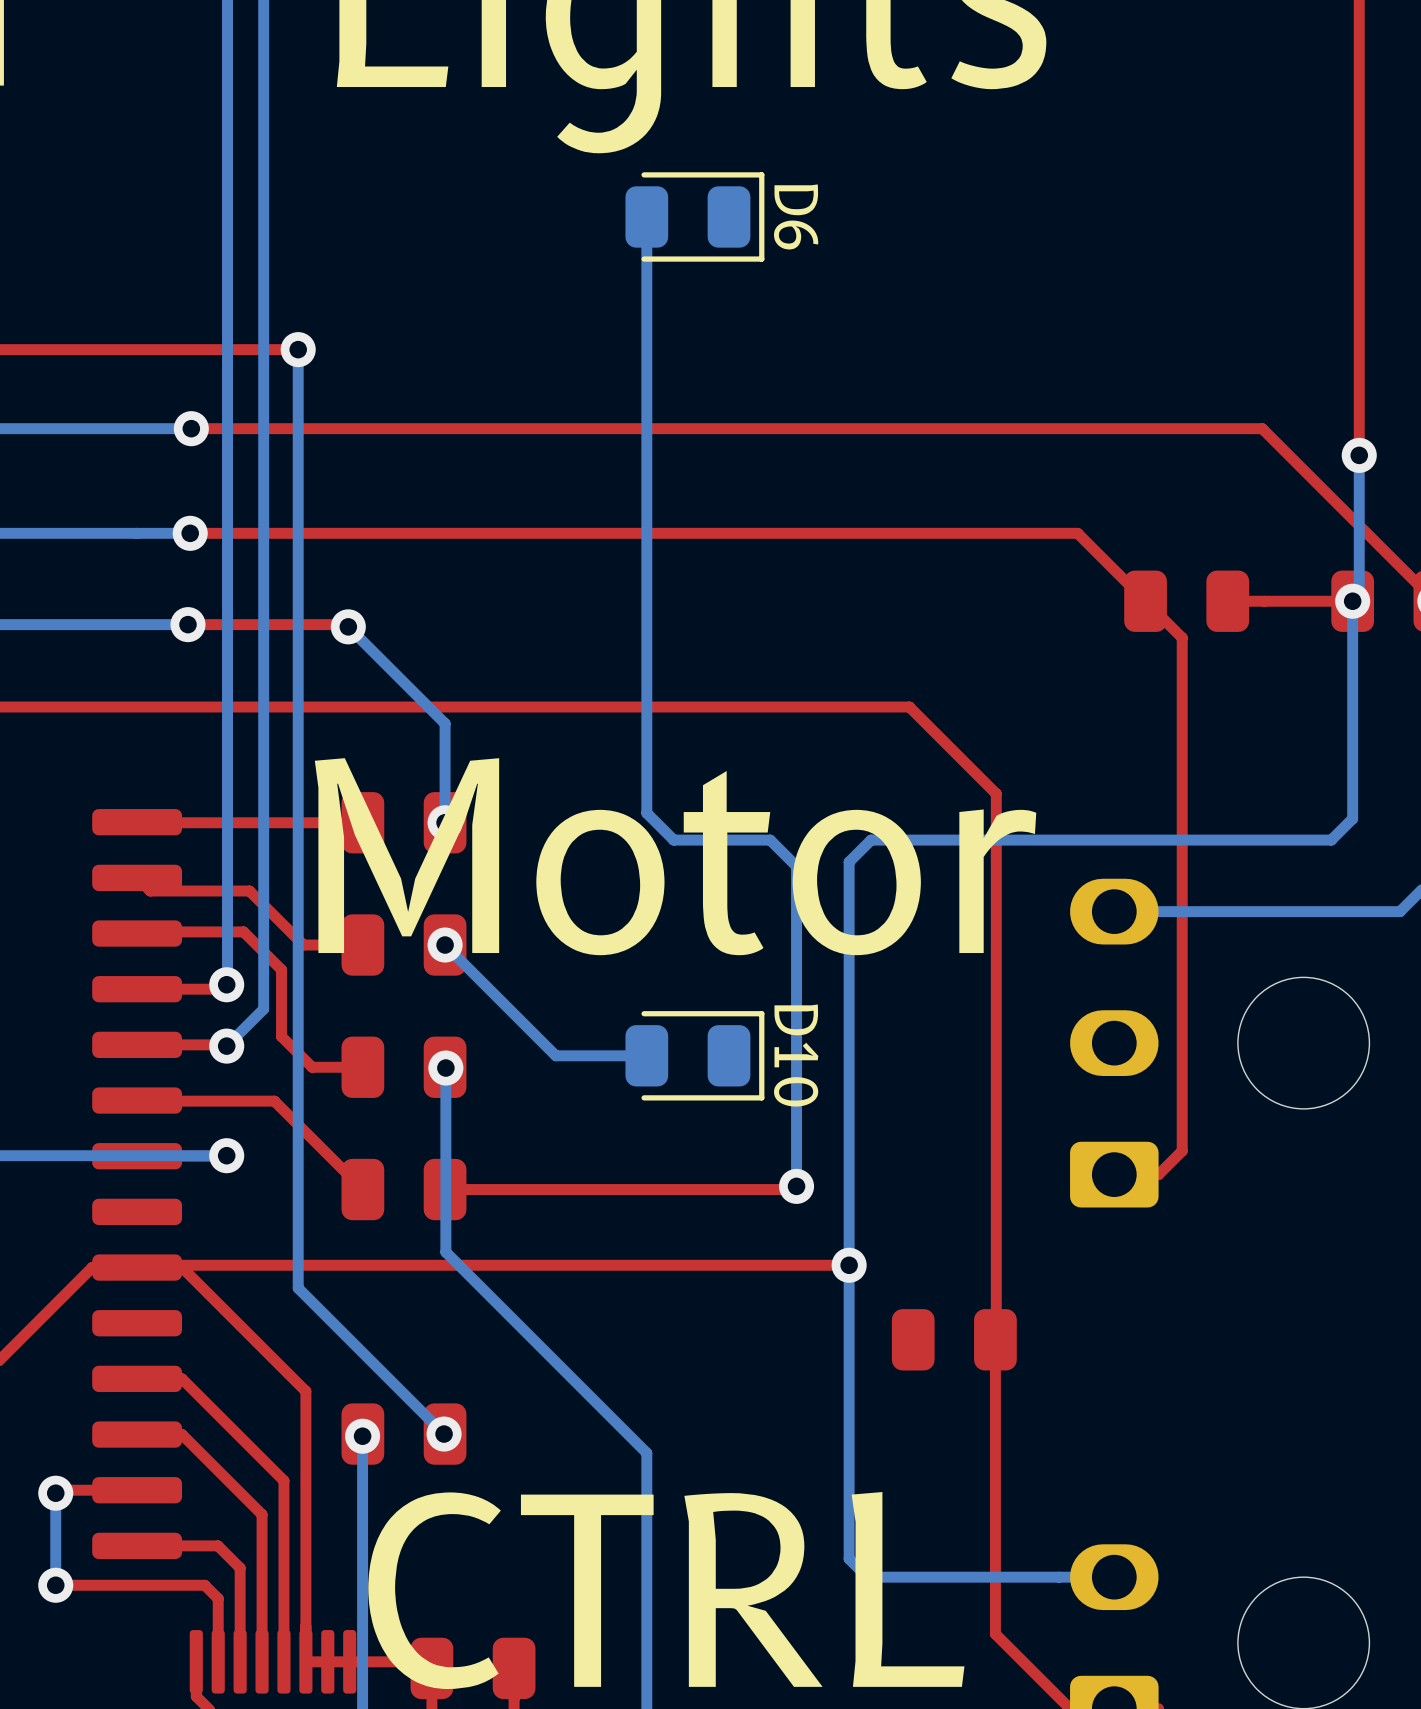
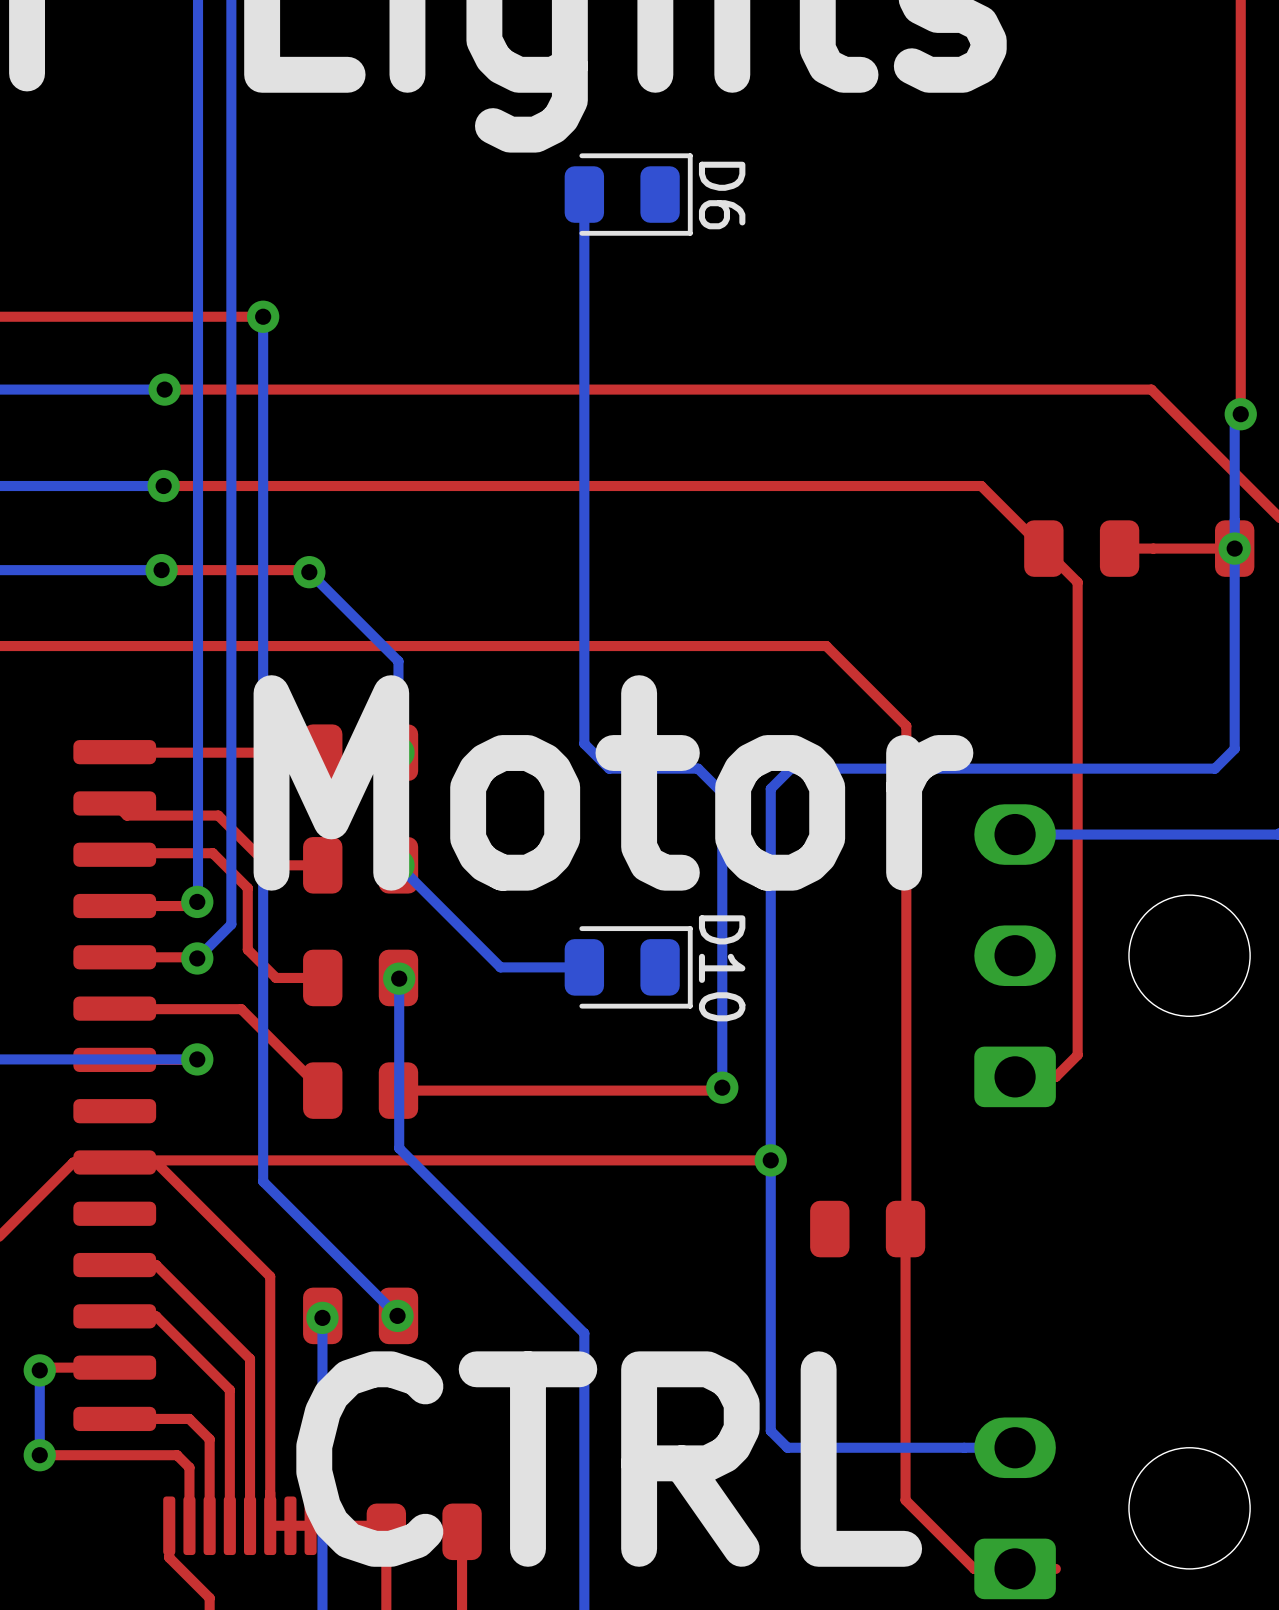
bottom track: none -> (1234, 414) (1234, 548)
bottom track: (1359, 455) (1359, 594) -> none

